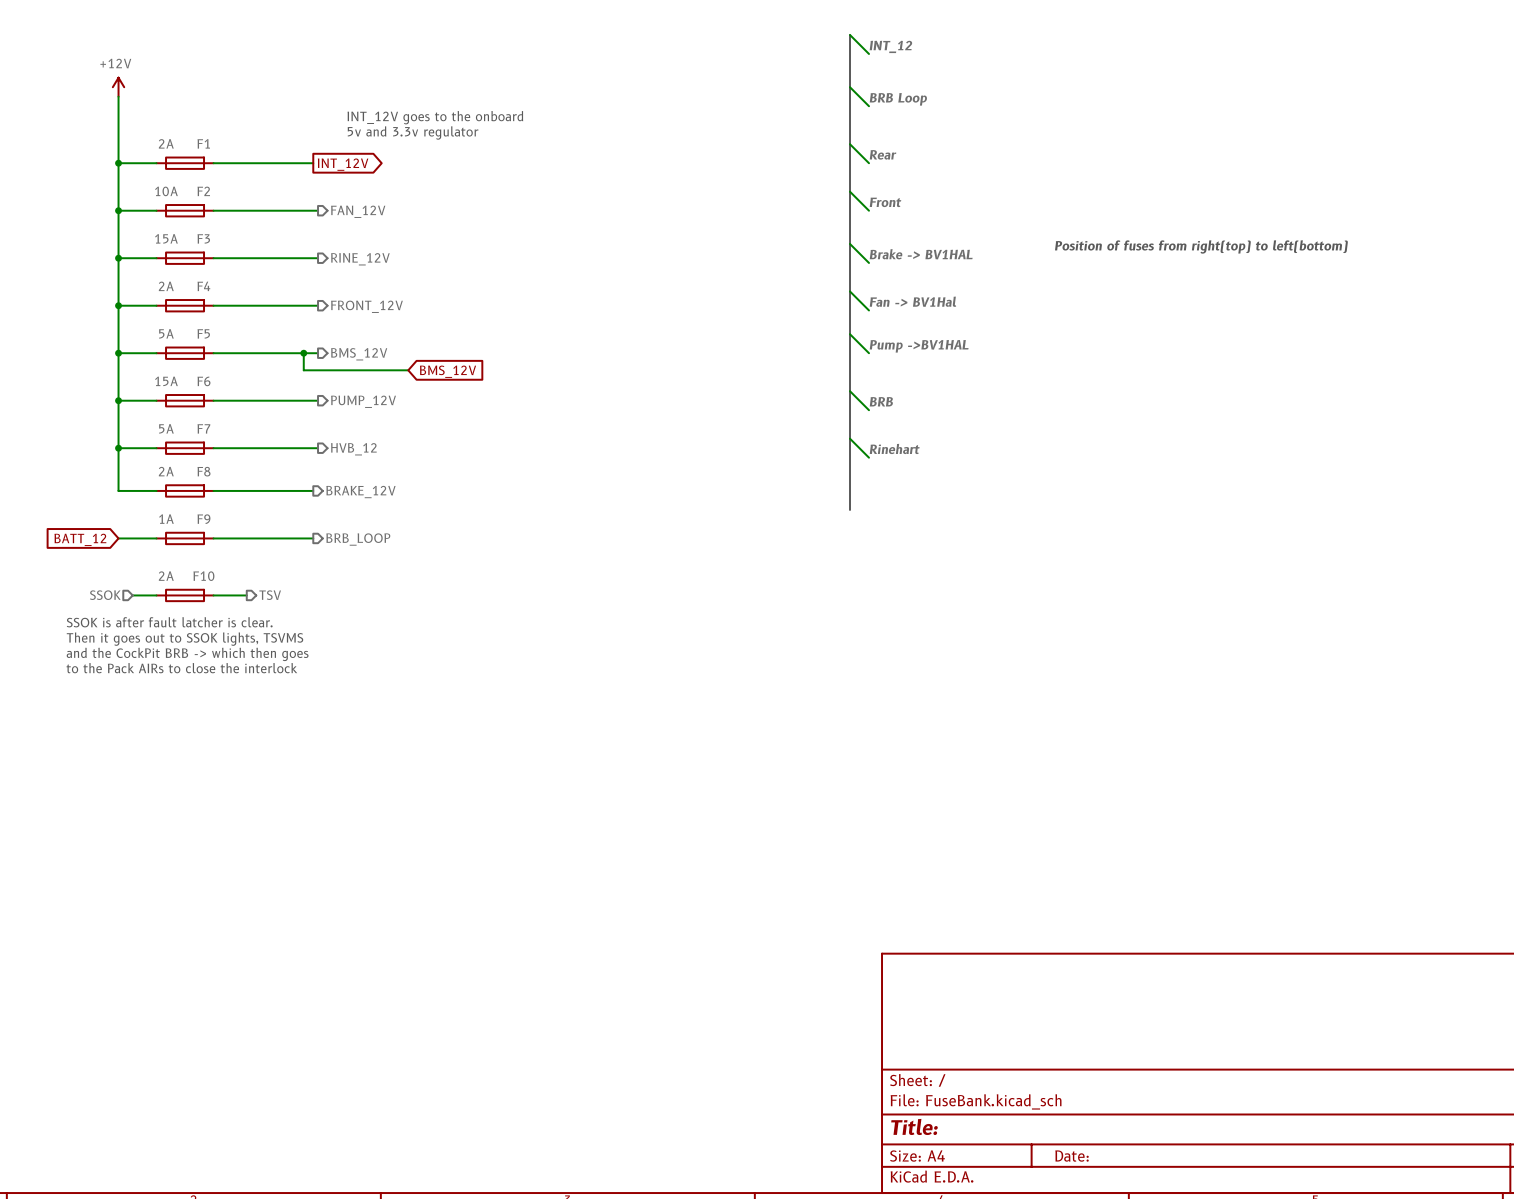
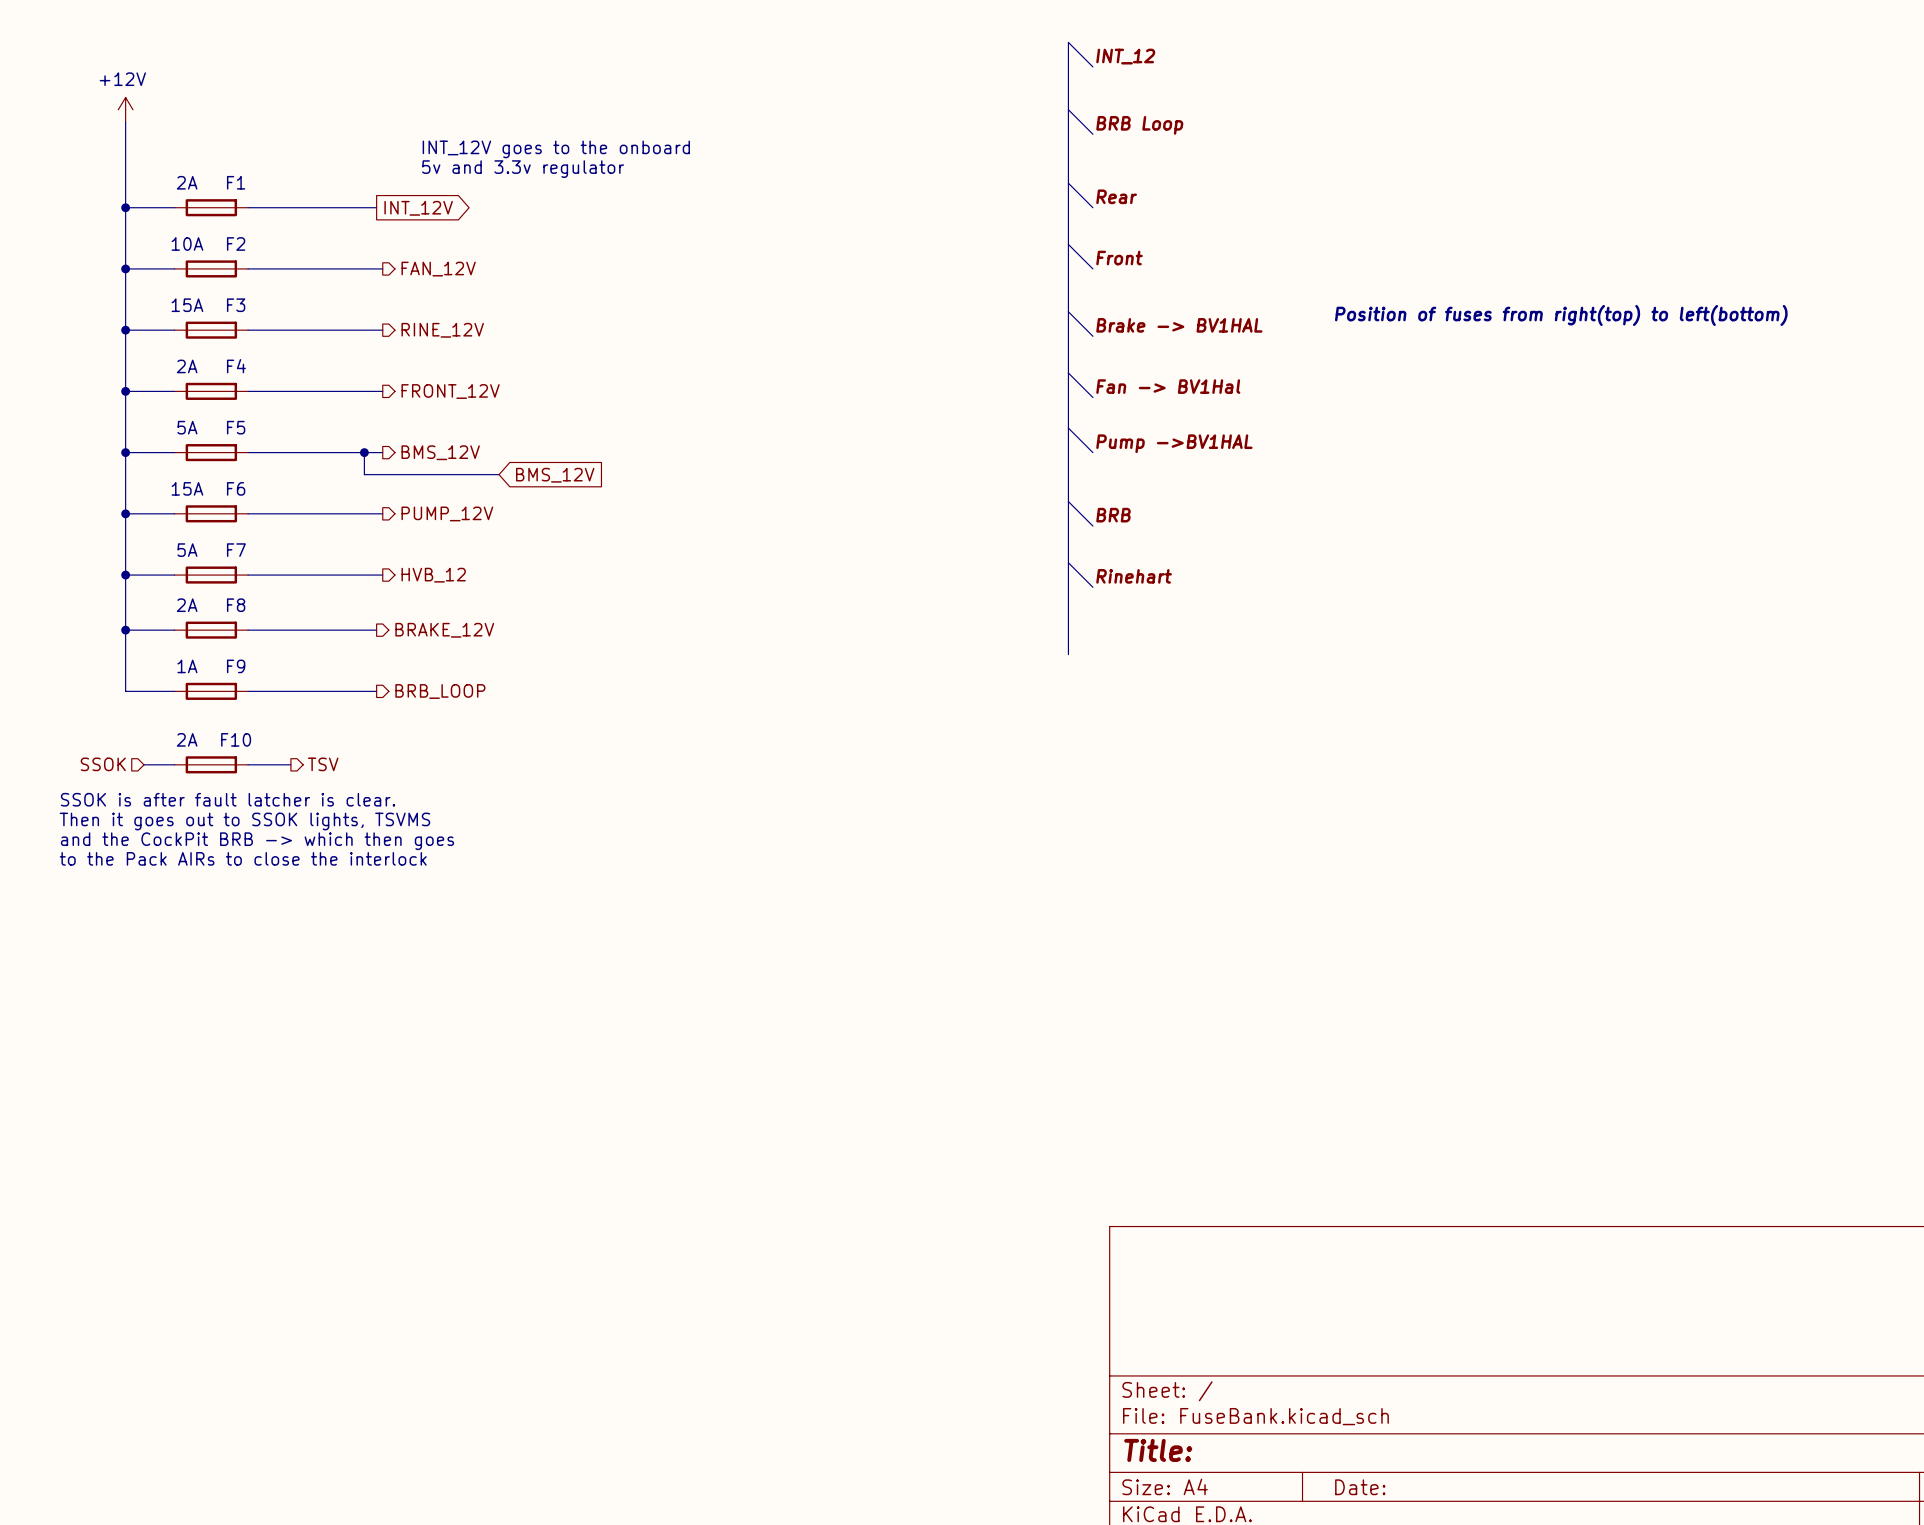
wire: none -> (125, 630) (125, 691)
junction: none -> (125, 630)
global label: BATT_12 (80, 539) -> none

